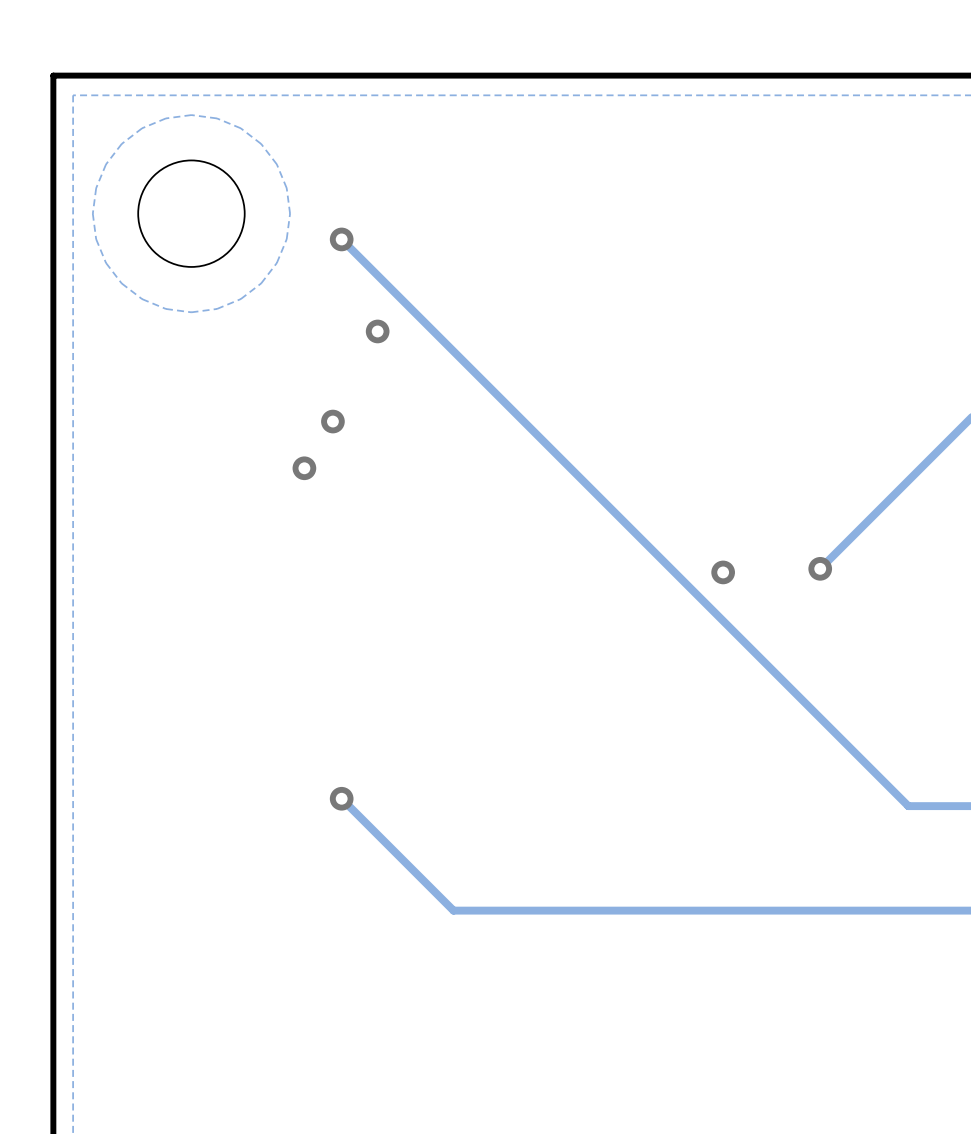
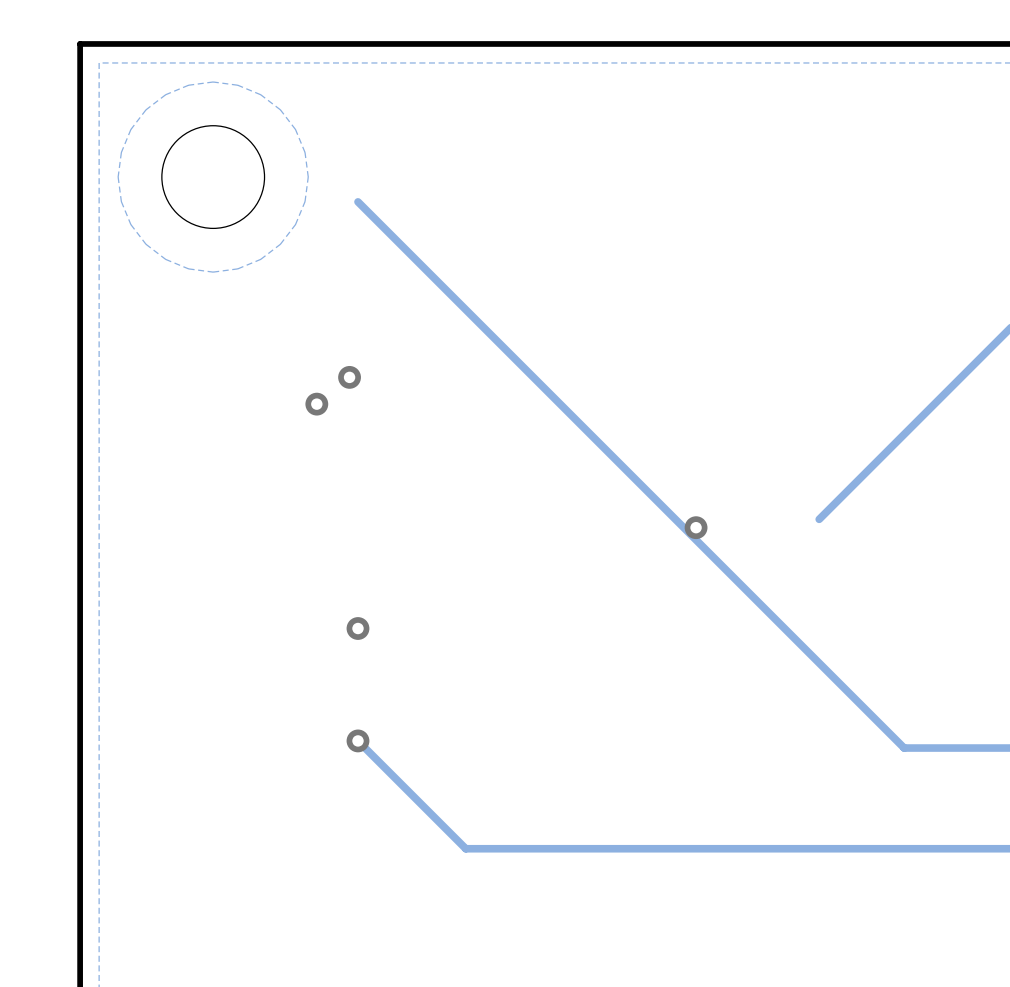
via: (341, 239) -> none
via: (377, 331) -> none
via position: (304, 468) -> (316, 404)
via: (820, 568) -> none
via position: (723, 572) -> (696, 527)
via: none -> (357, 628)

